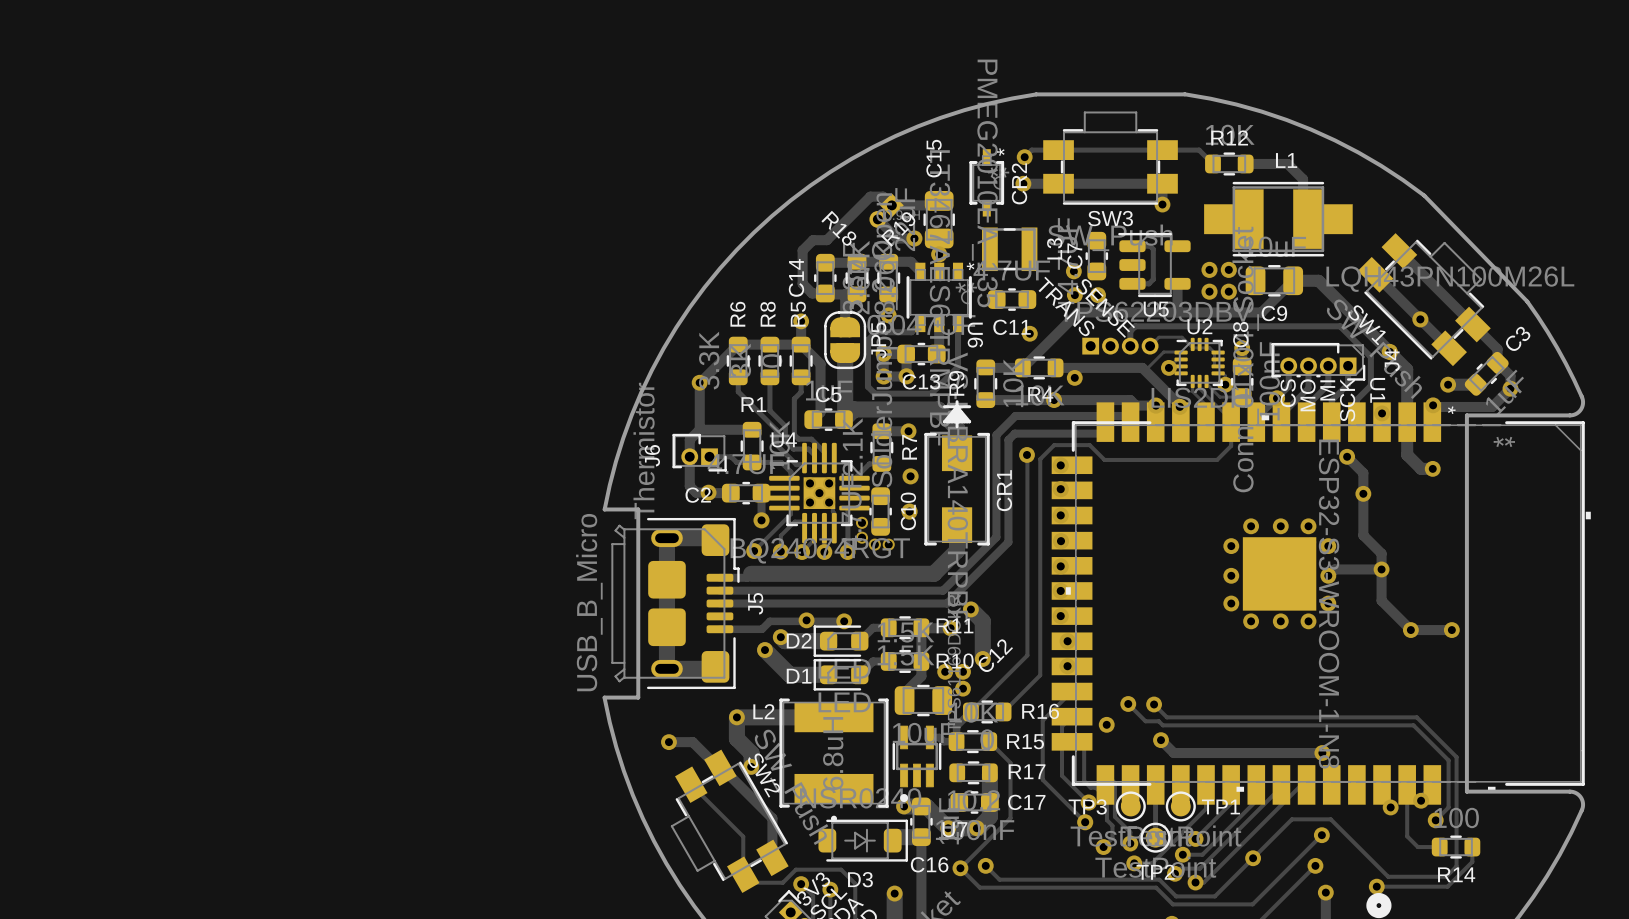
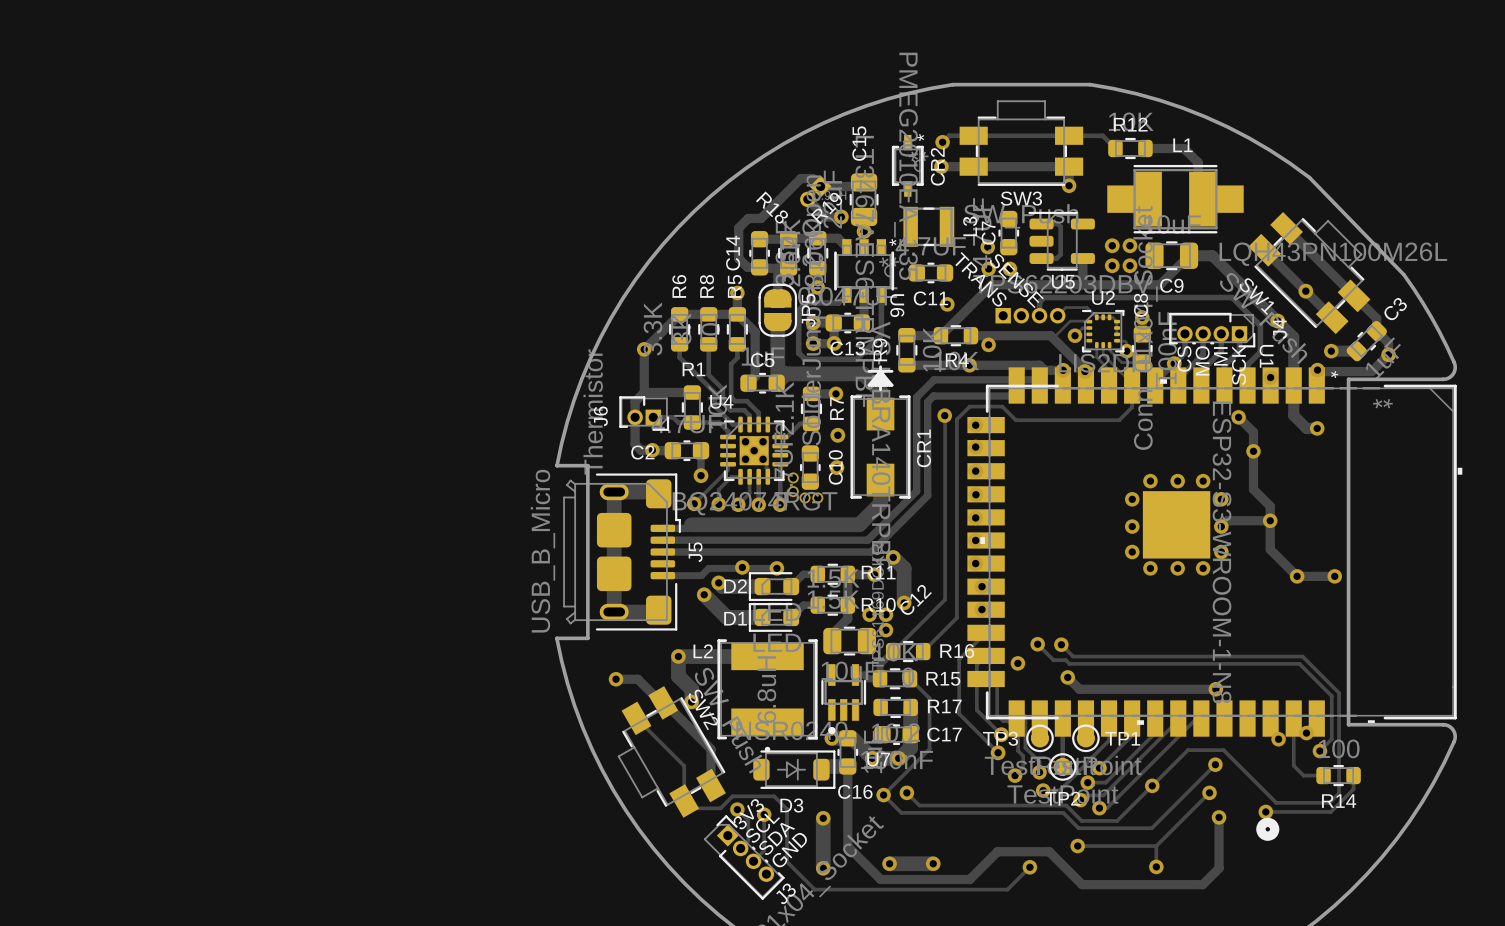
U2 footprint: [1174, 337, 1225, 389] -> [1081, 309, 1125, 353]
U4 footprint: [769, 442, 870, 544] -> [720, 416, 789, 485]

